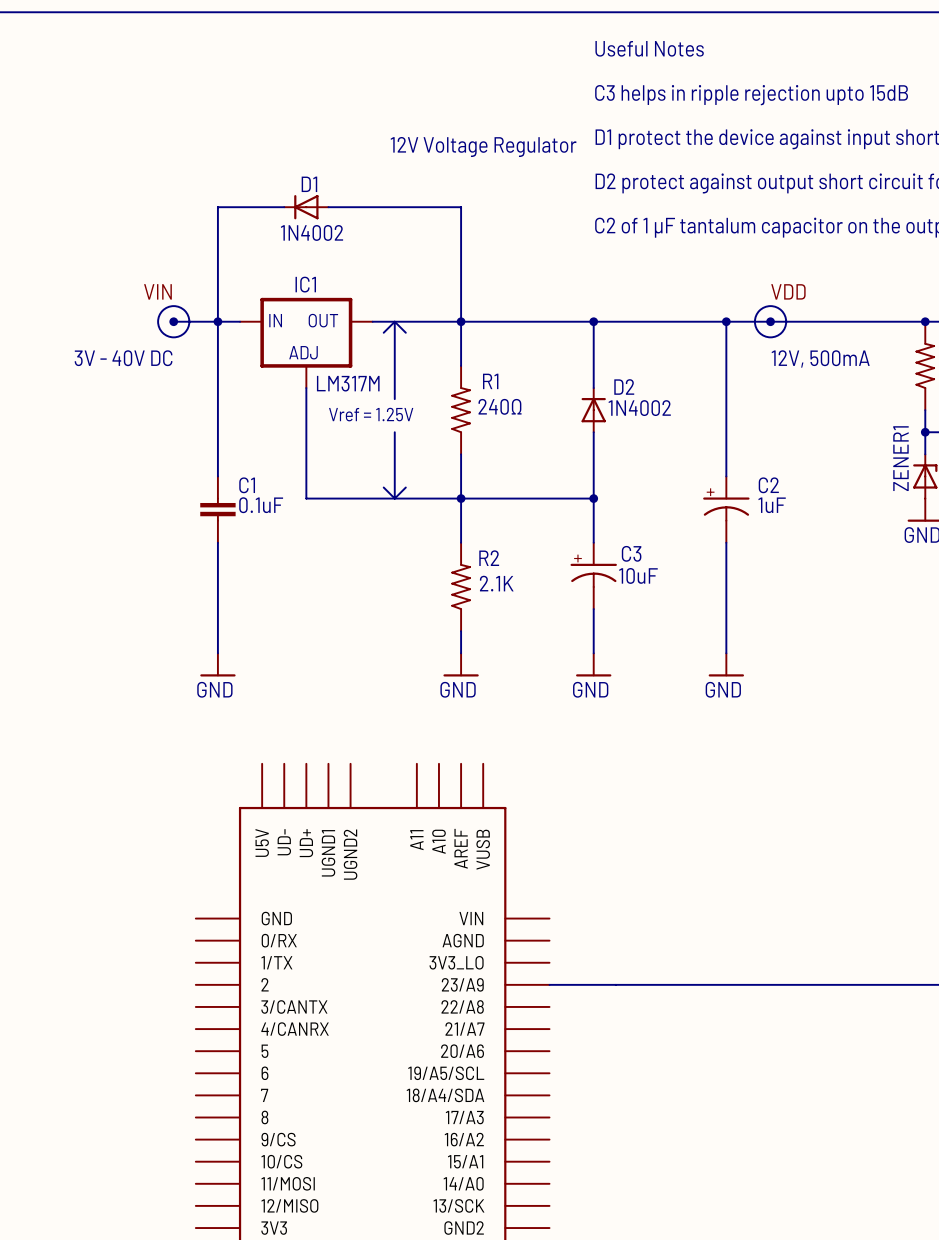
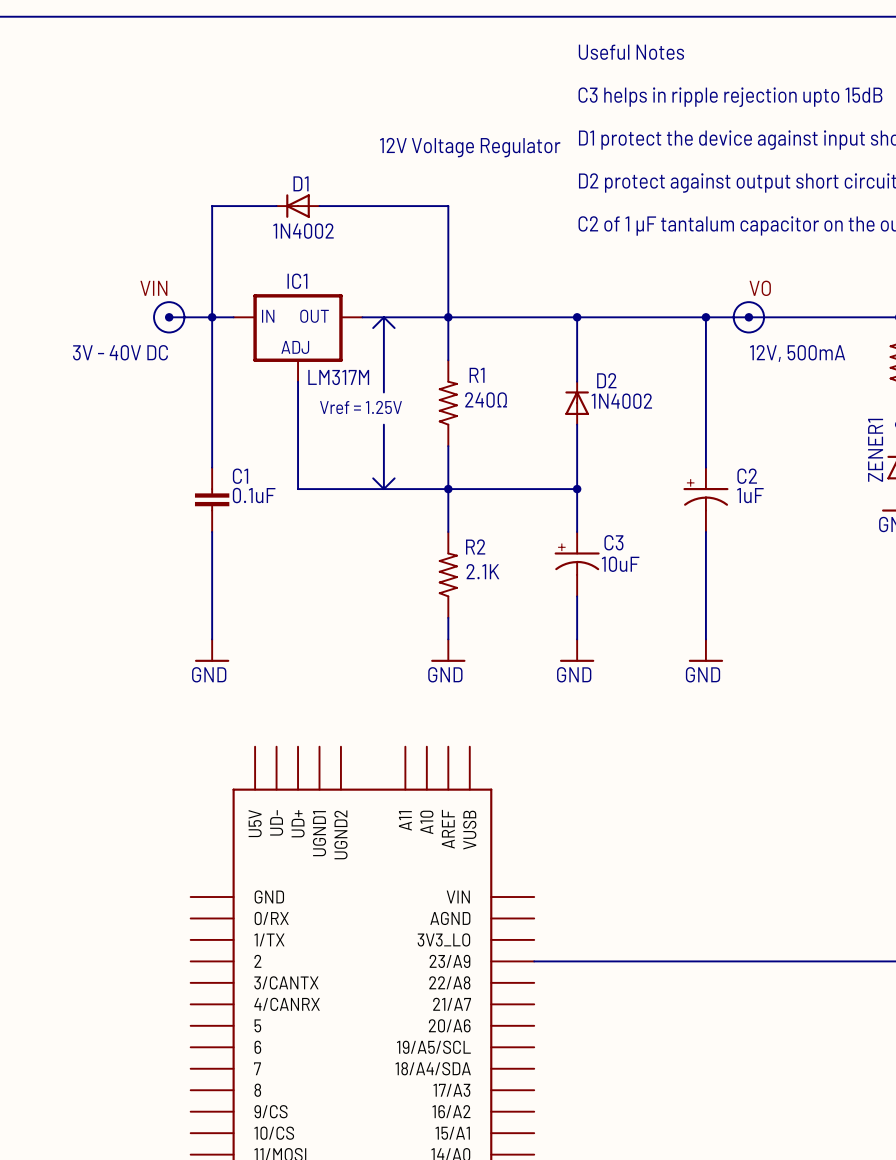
label: VDD (788, 291) -> VO (760, 288)

